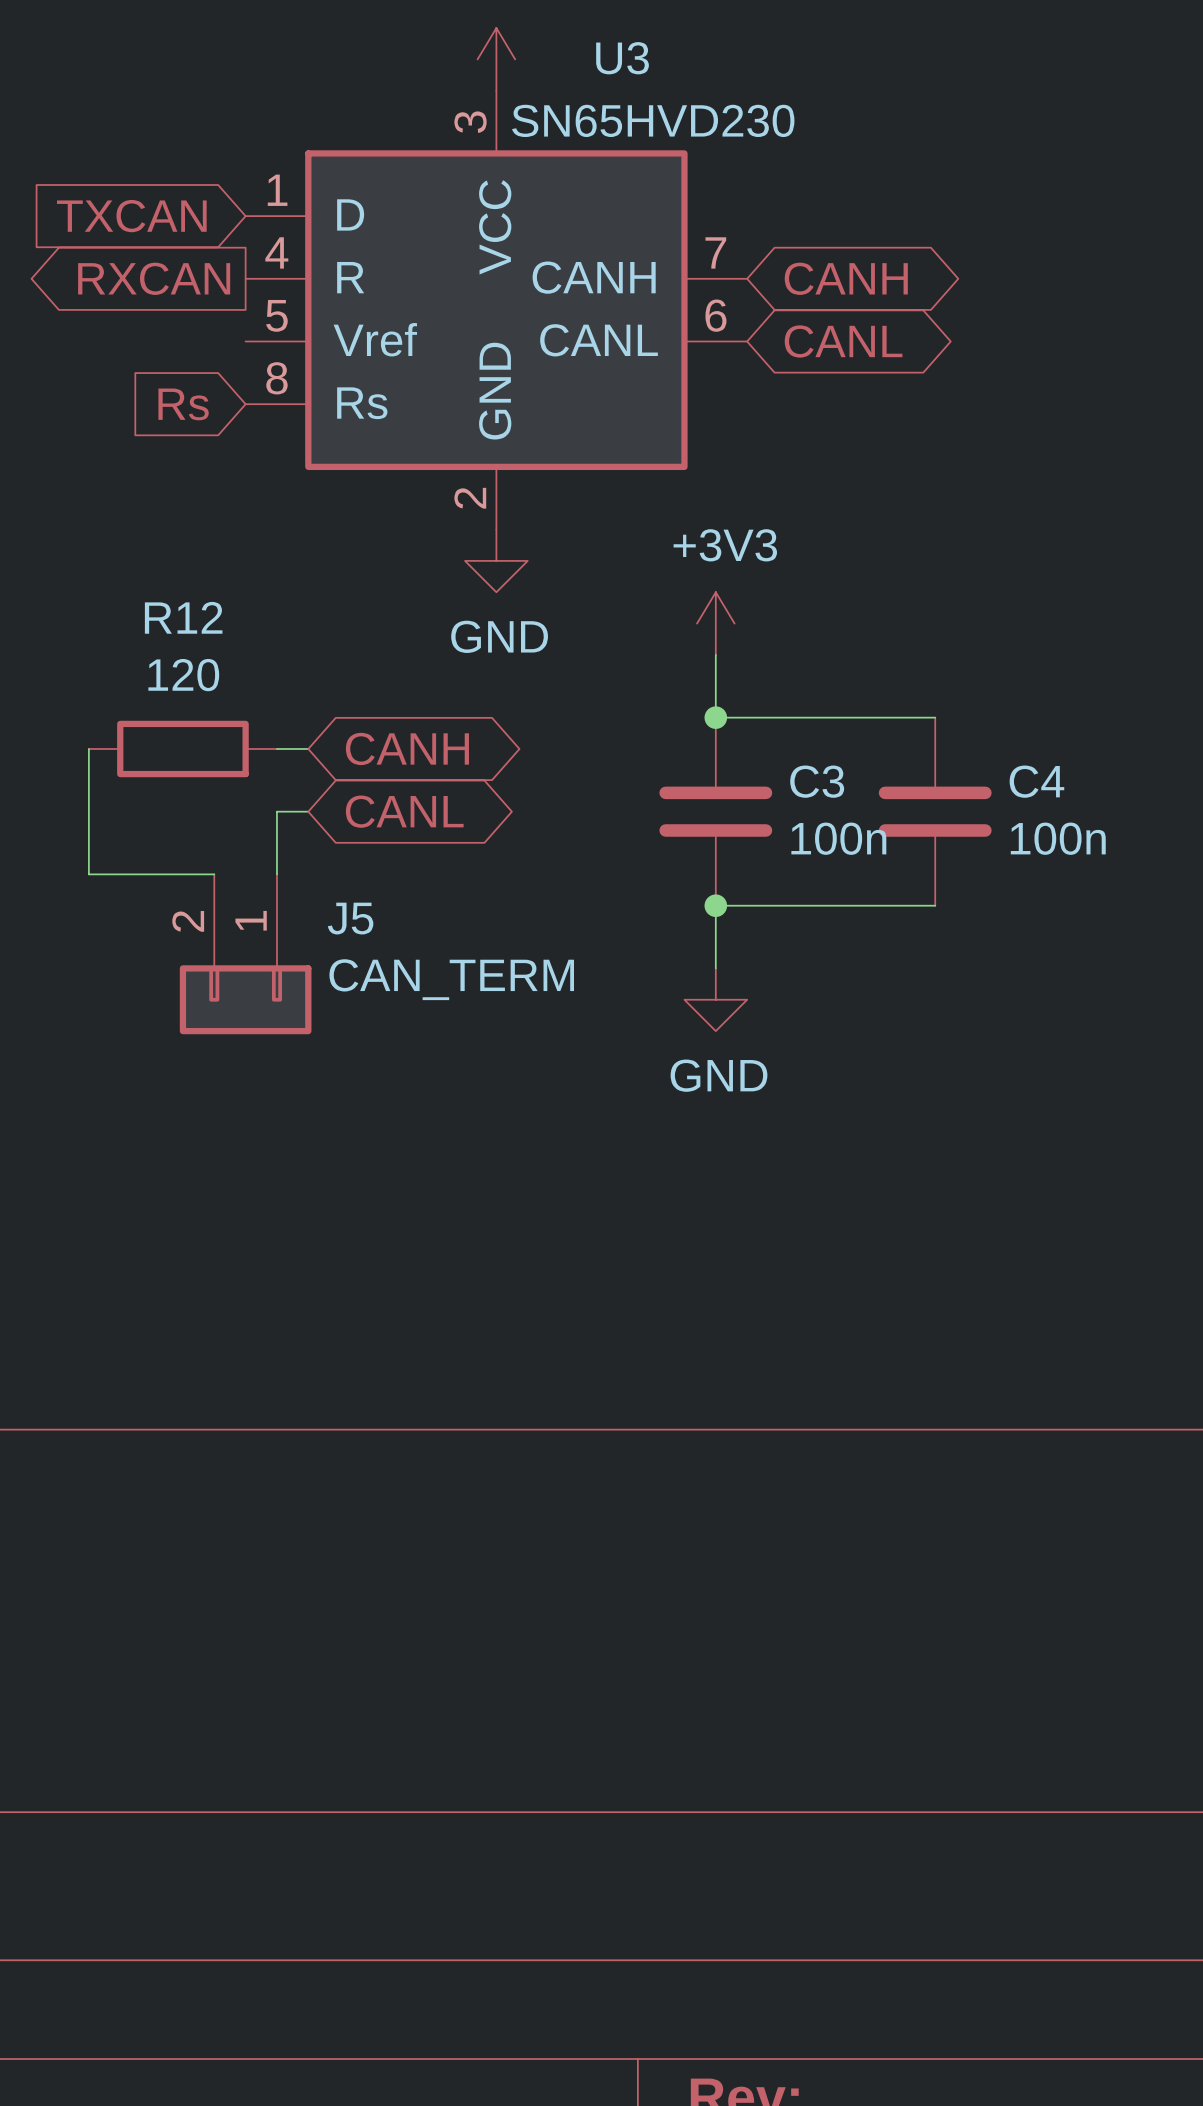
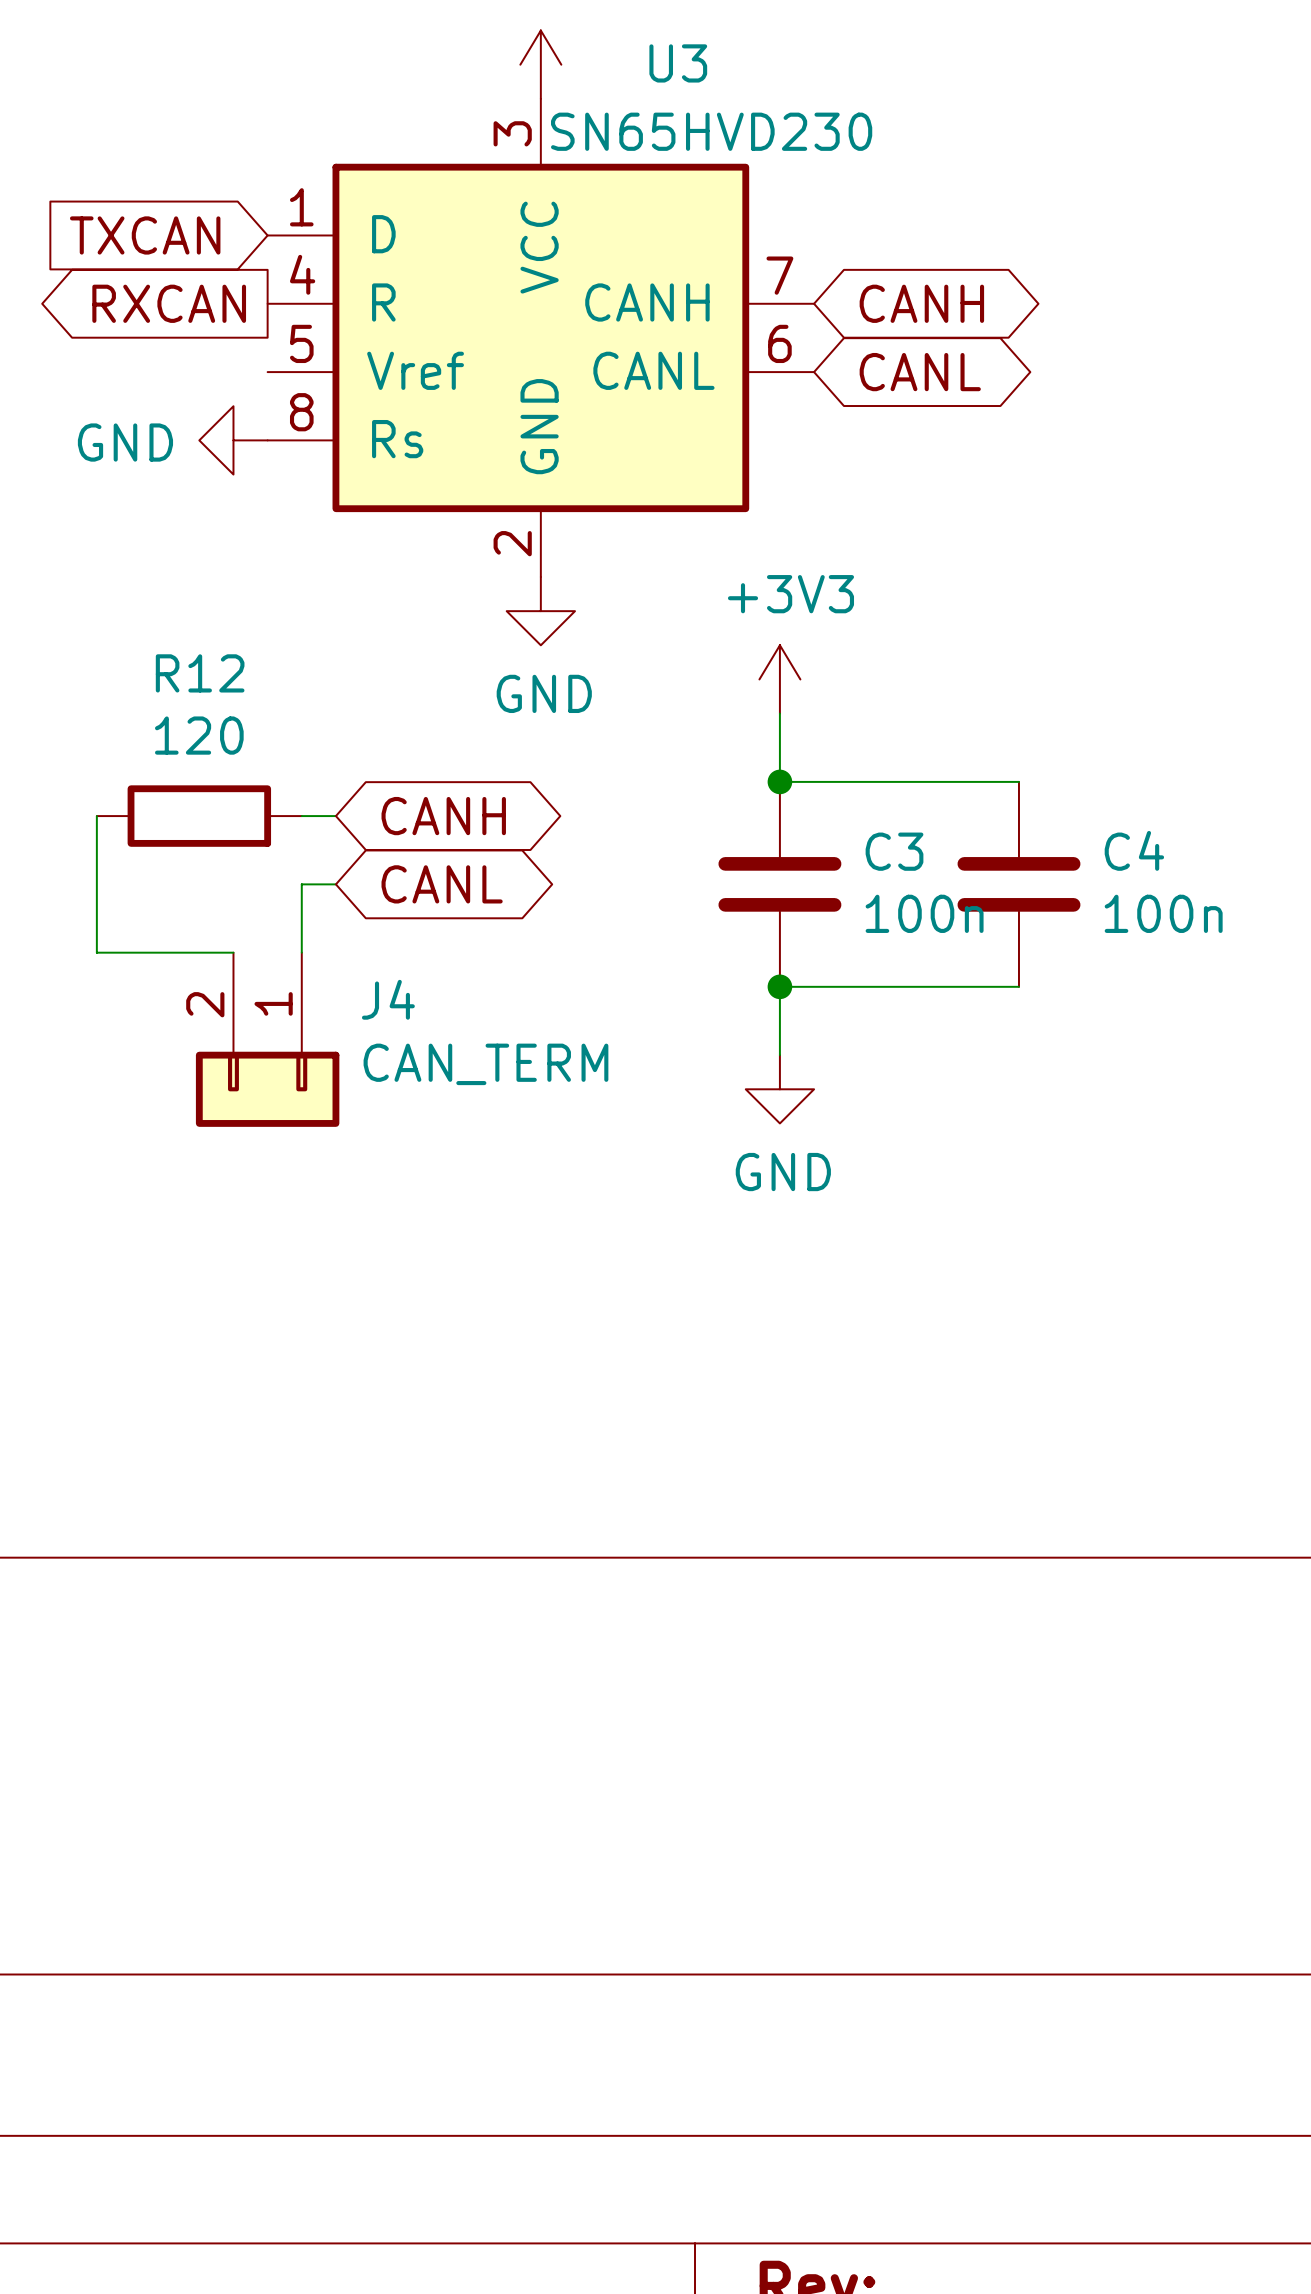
global label: Rs (183, 404) -> none
power symbol: none -> GND (233, 440)
J5 name: J5 (350, 918) -> J4 (388, 999)

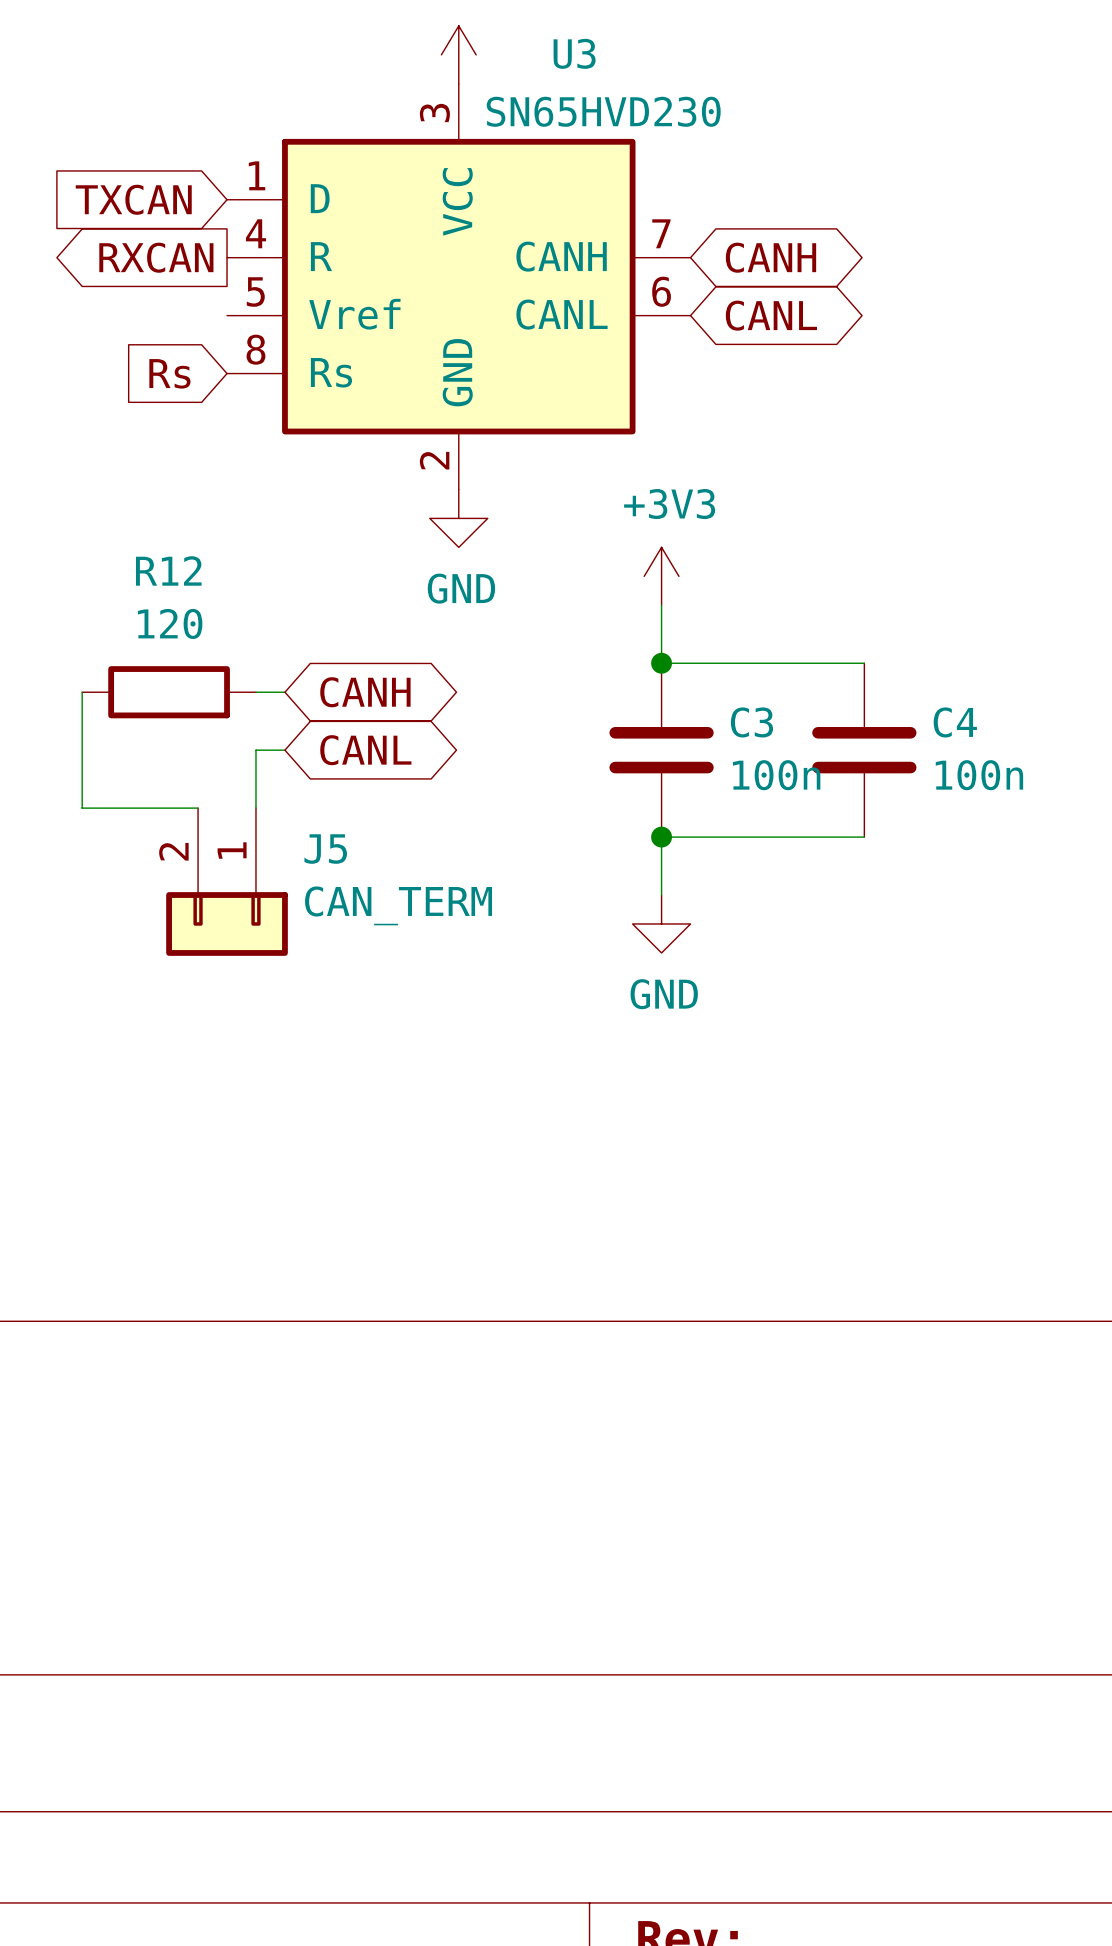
global label: none -> Rs (169, 373)
power symbol: GND (233, 440) -> none
J4 name: J4 (388, 999) -> J5 (325, 849)

